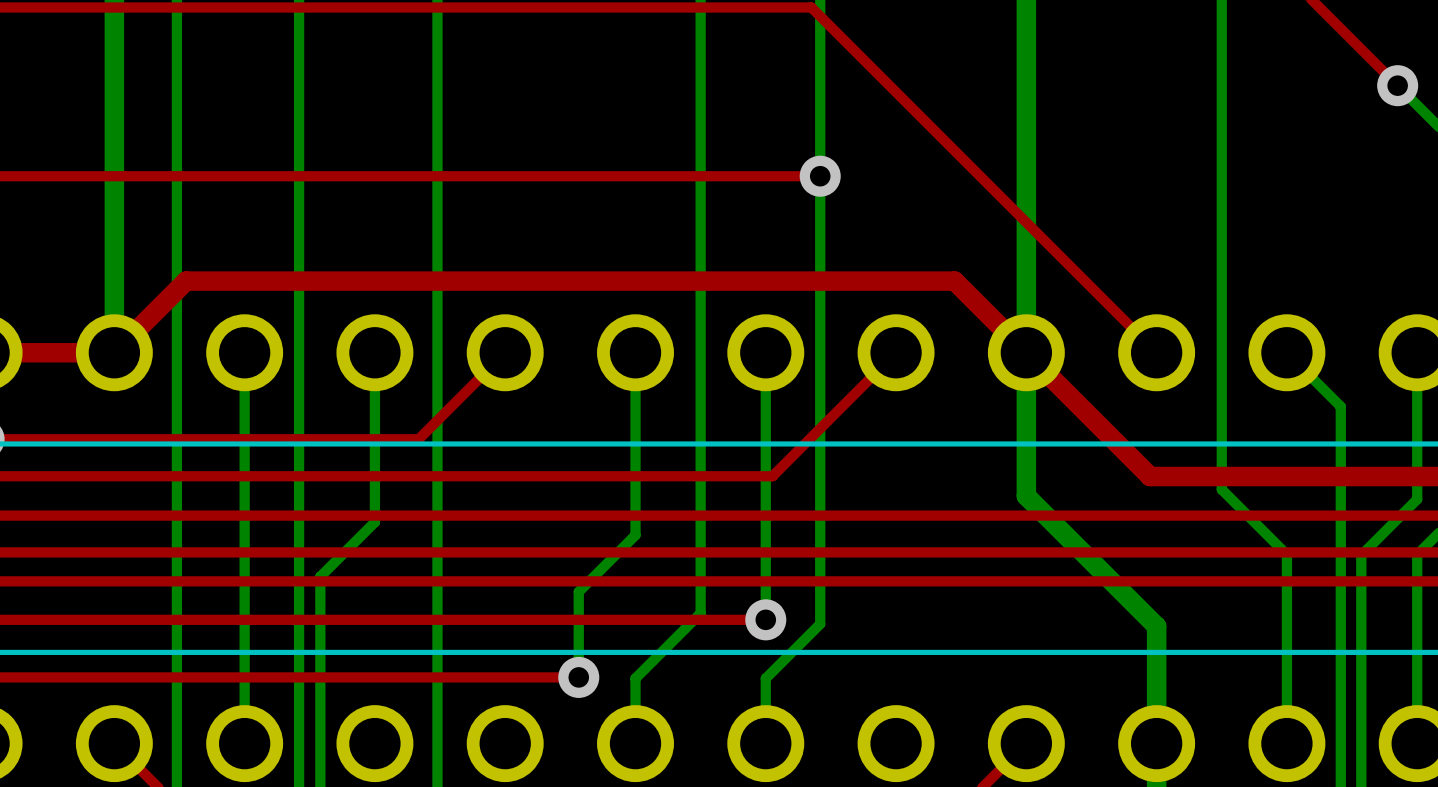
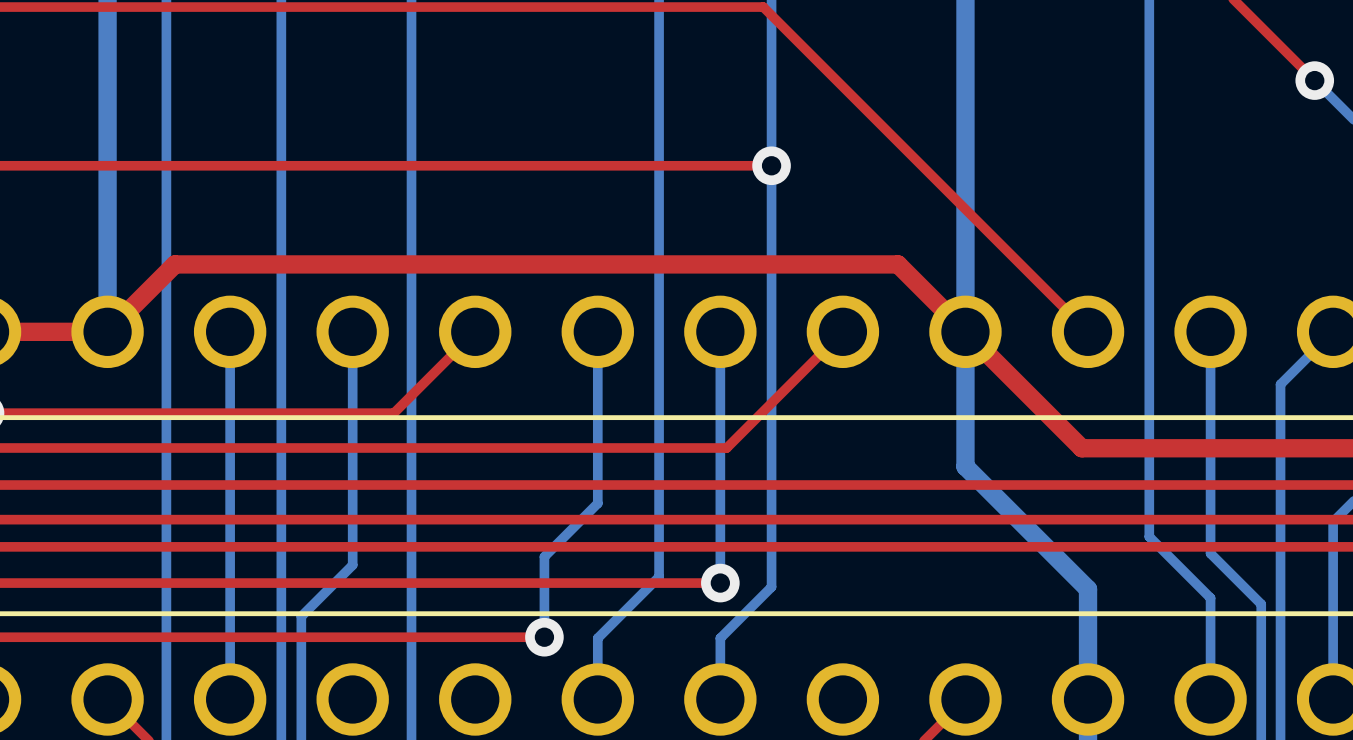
bottom track: (1286, 352) (1340, 406) (1340, 642) -> (1210, 331) (1210, 521)
bottom track: (1417, 352) (1417, 499) (1361, 555) -> (1333, 331) (1280, 384) (1280, 522)
bottom track: (1221, 489) (1286, 554) -> (1149, 460) (1149, 536) (1210, 598)
bottom track: (374, 522) (320, 576) (320, 655) -> (352, 491) (352, 565) (301, 616)
bottom track: (1286, 588) (1286, 635) -> (1210, 553) (1261, 604)

